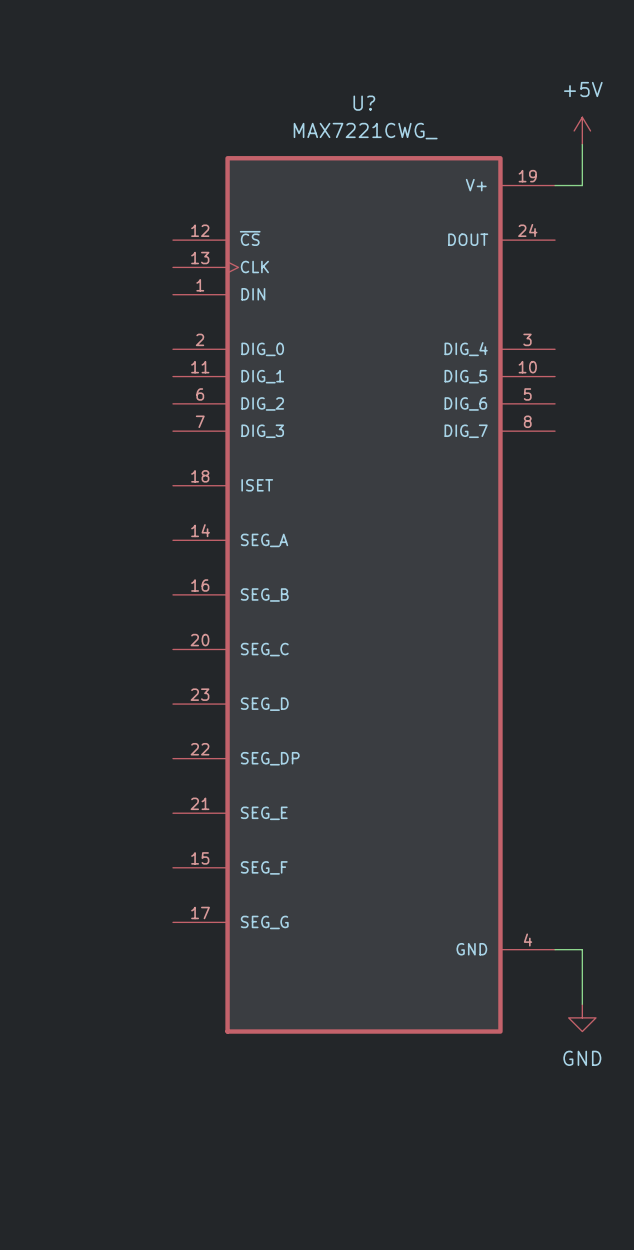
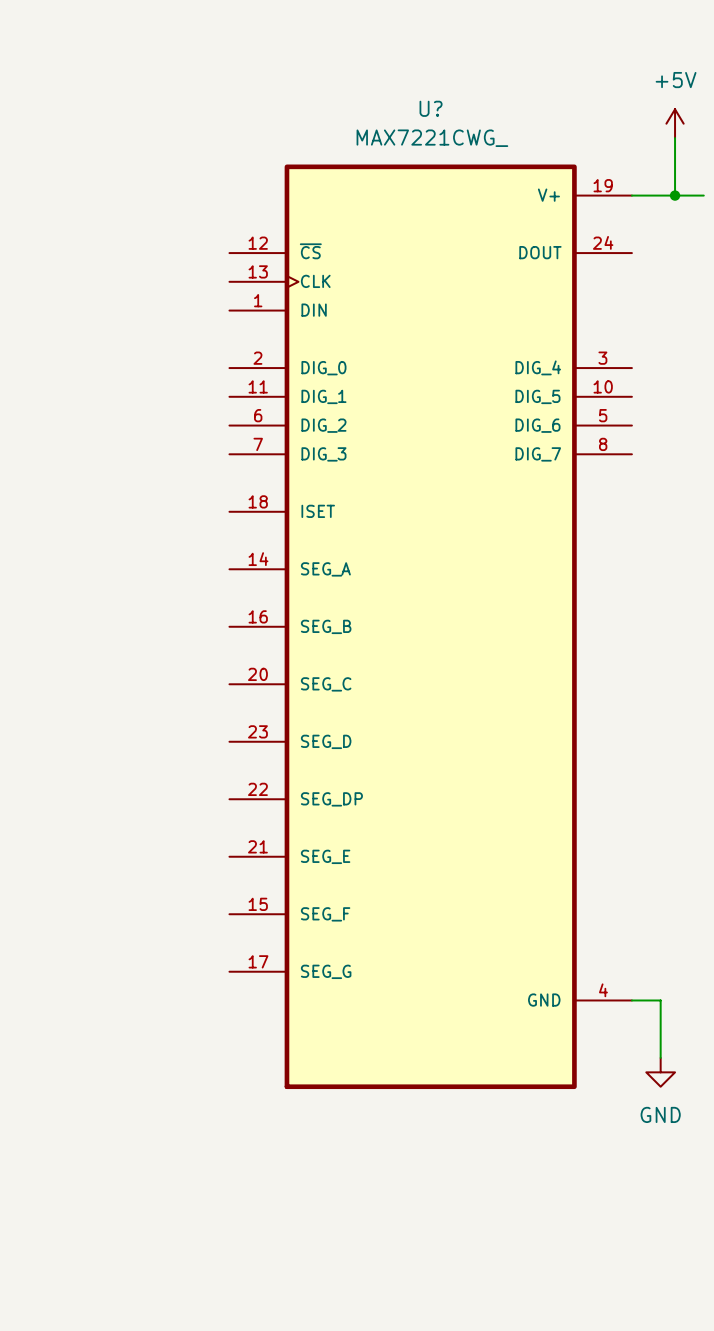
power symbol position: +5V (582, 130) -> +5V (675, 123)
wire: none -> (675, 138) (675, 195)
wire: (582, 144) (582, 185) -> (703, 195) (660, 195)
junction: none -> (675, 195)

